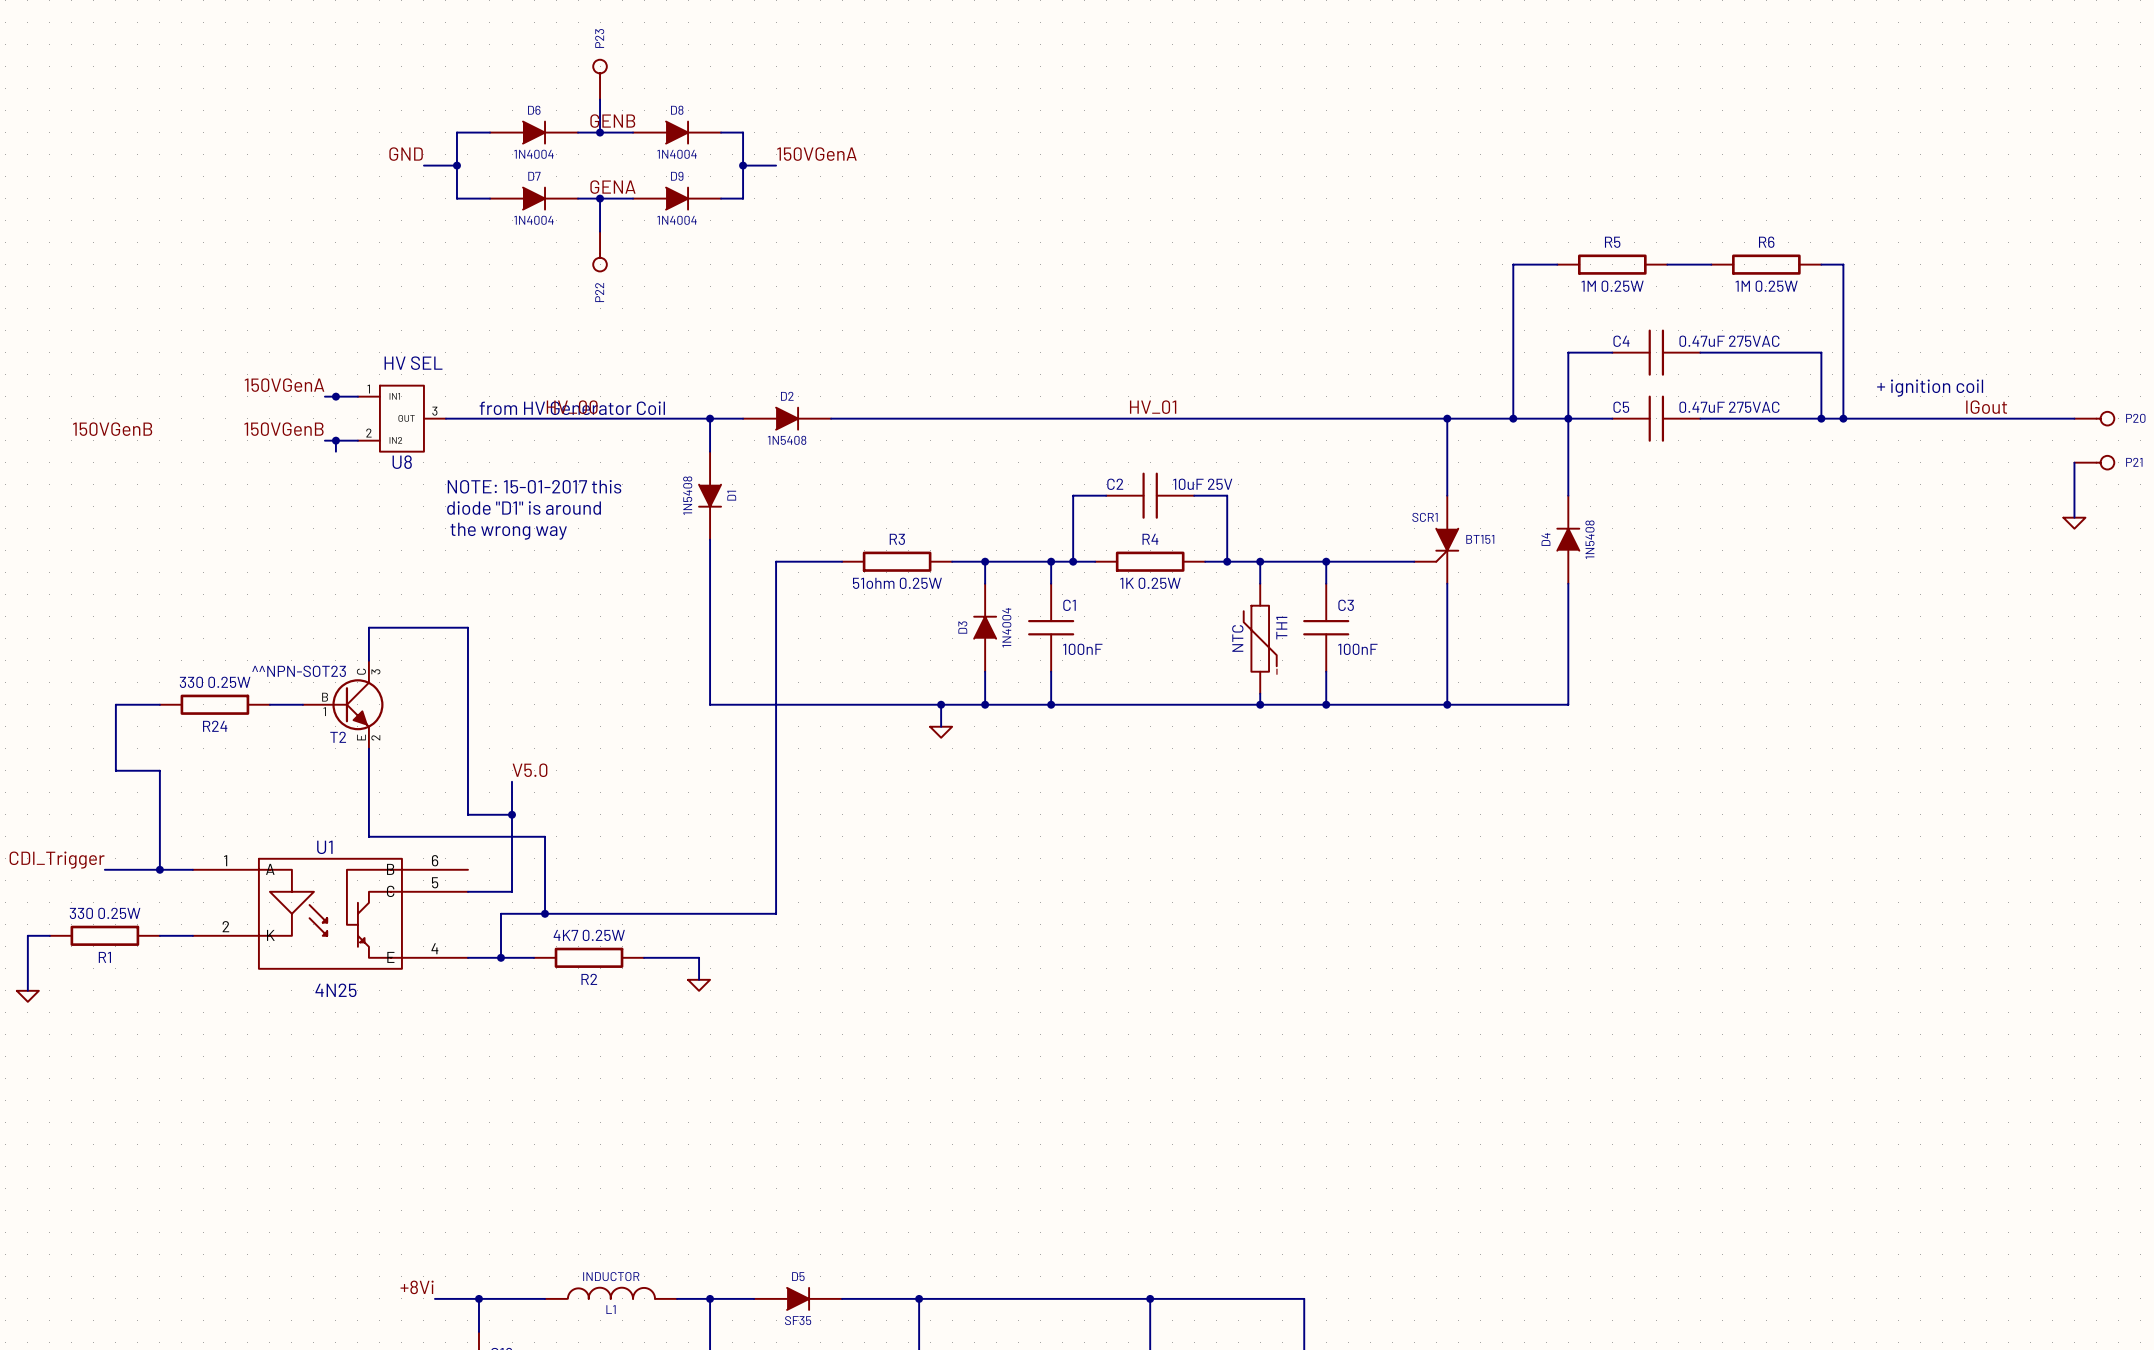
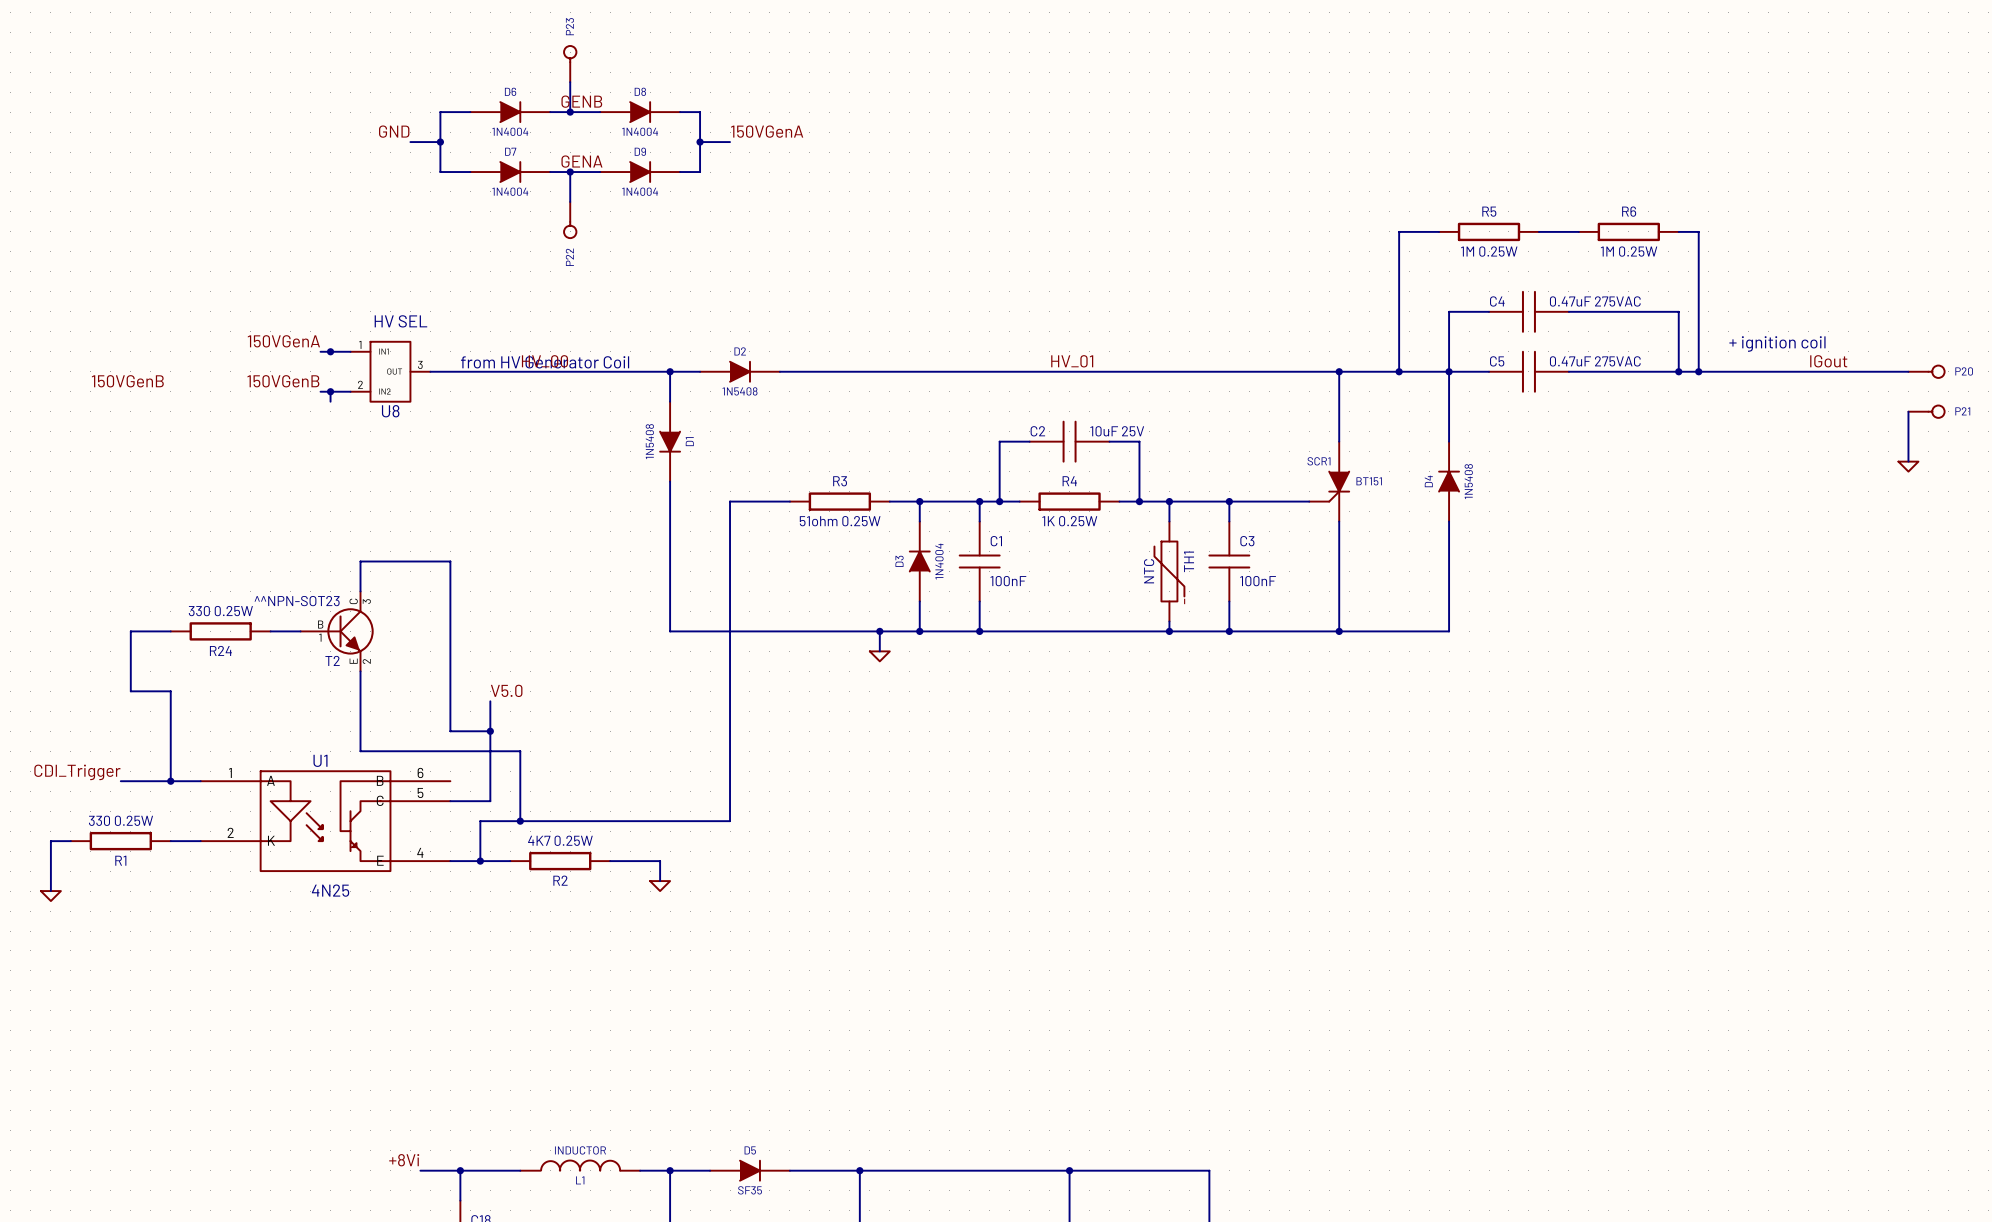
text: NOTE: 15-01-2017 this (534, 486) -> none
text: diode "D1" is around (524, 508) -> none
text: the wrong way (508, 531) -> none

